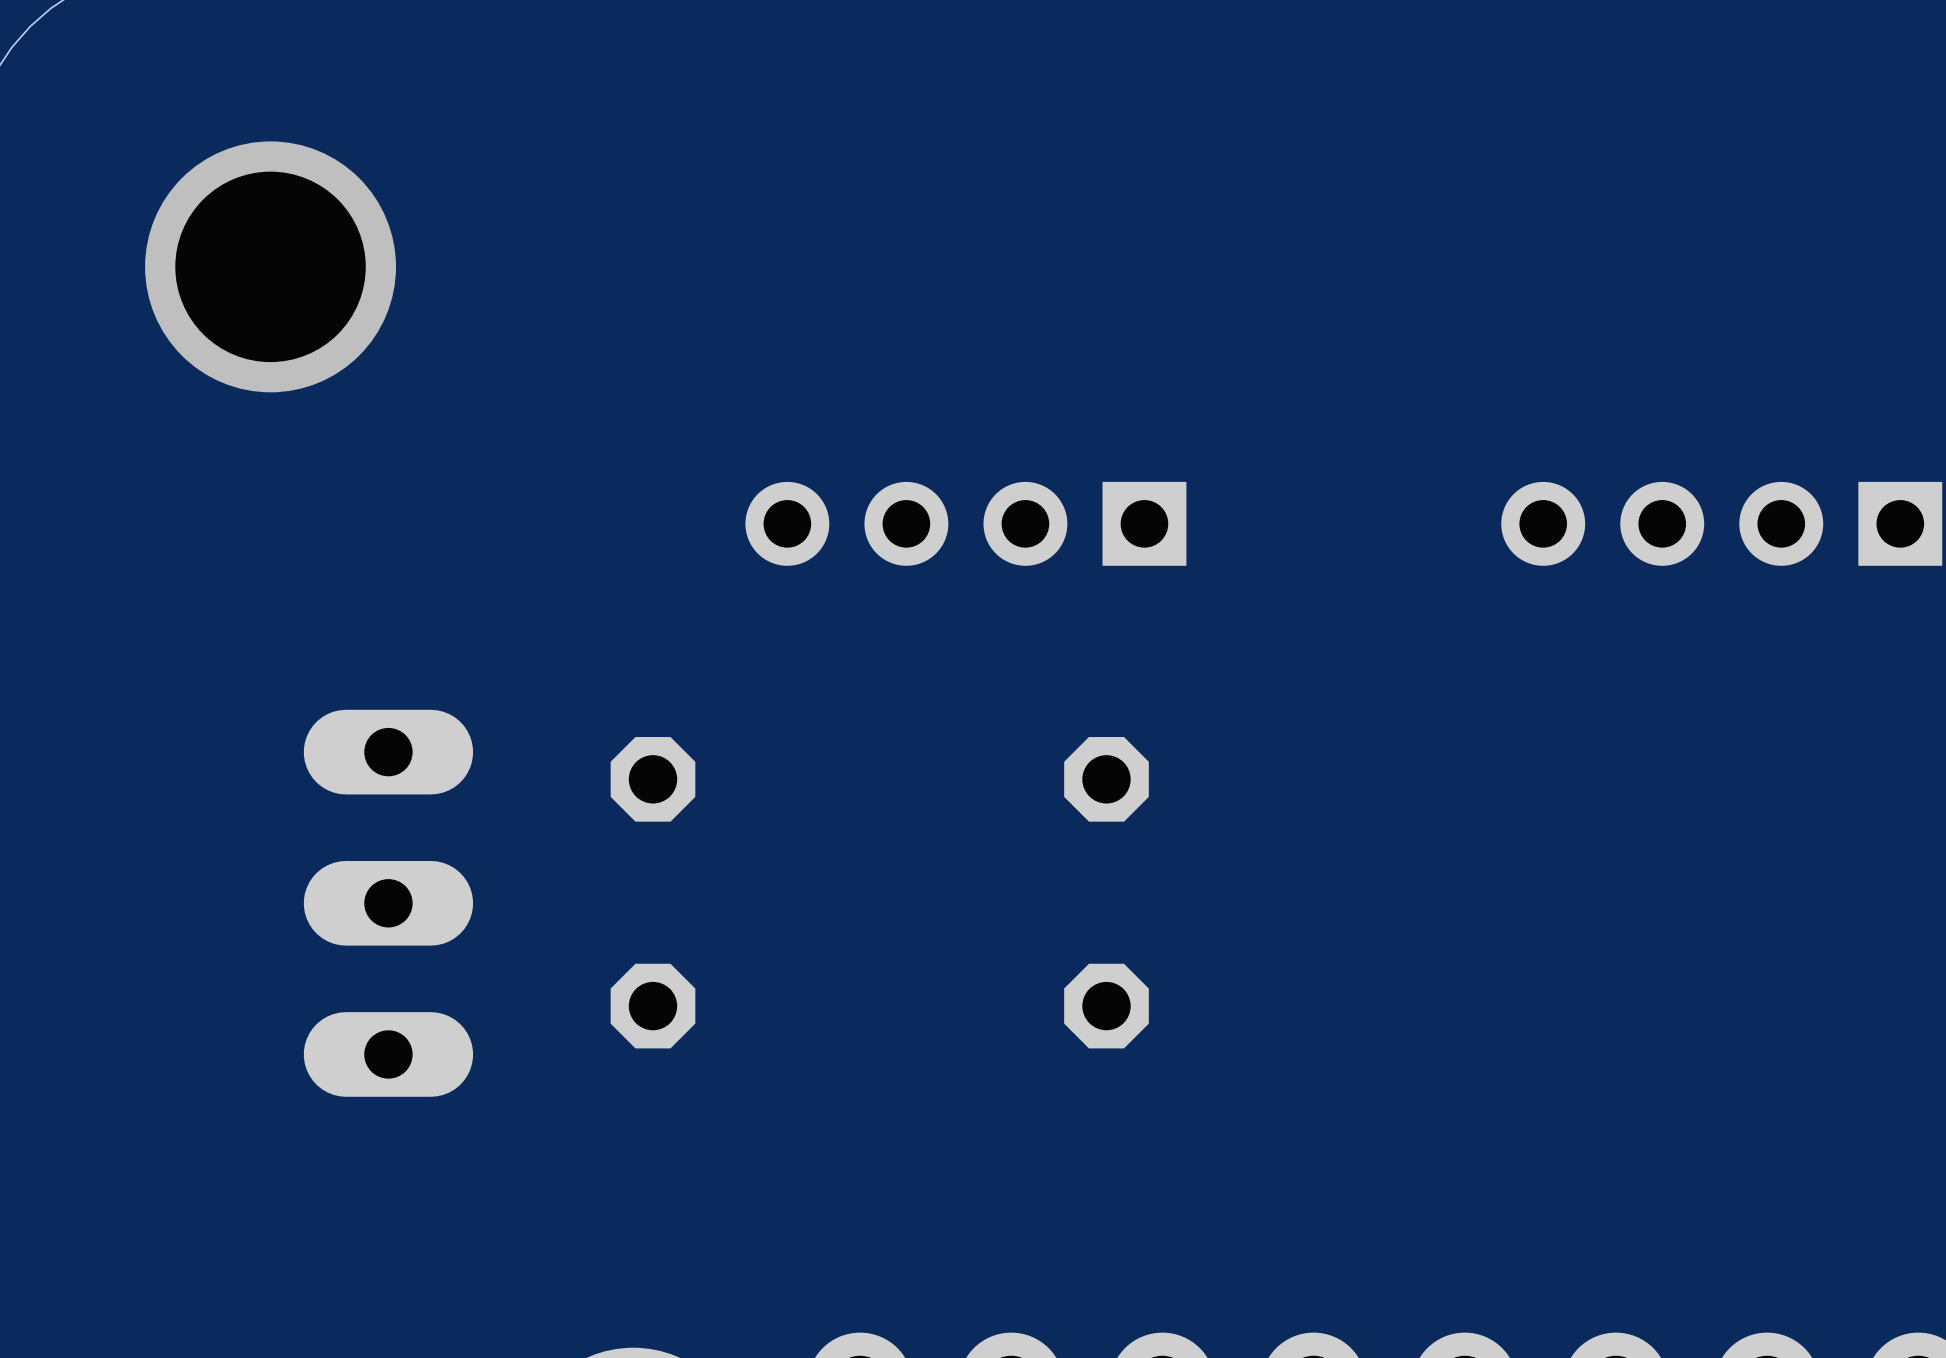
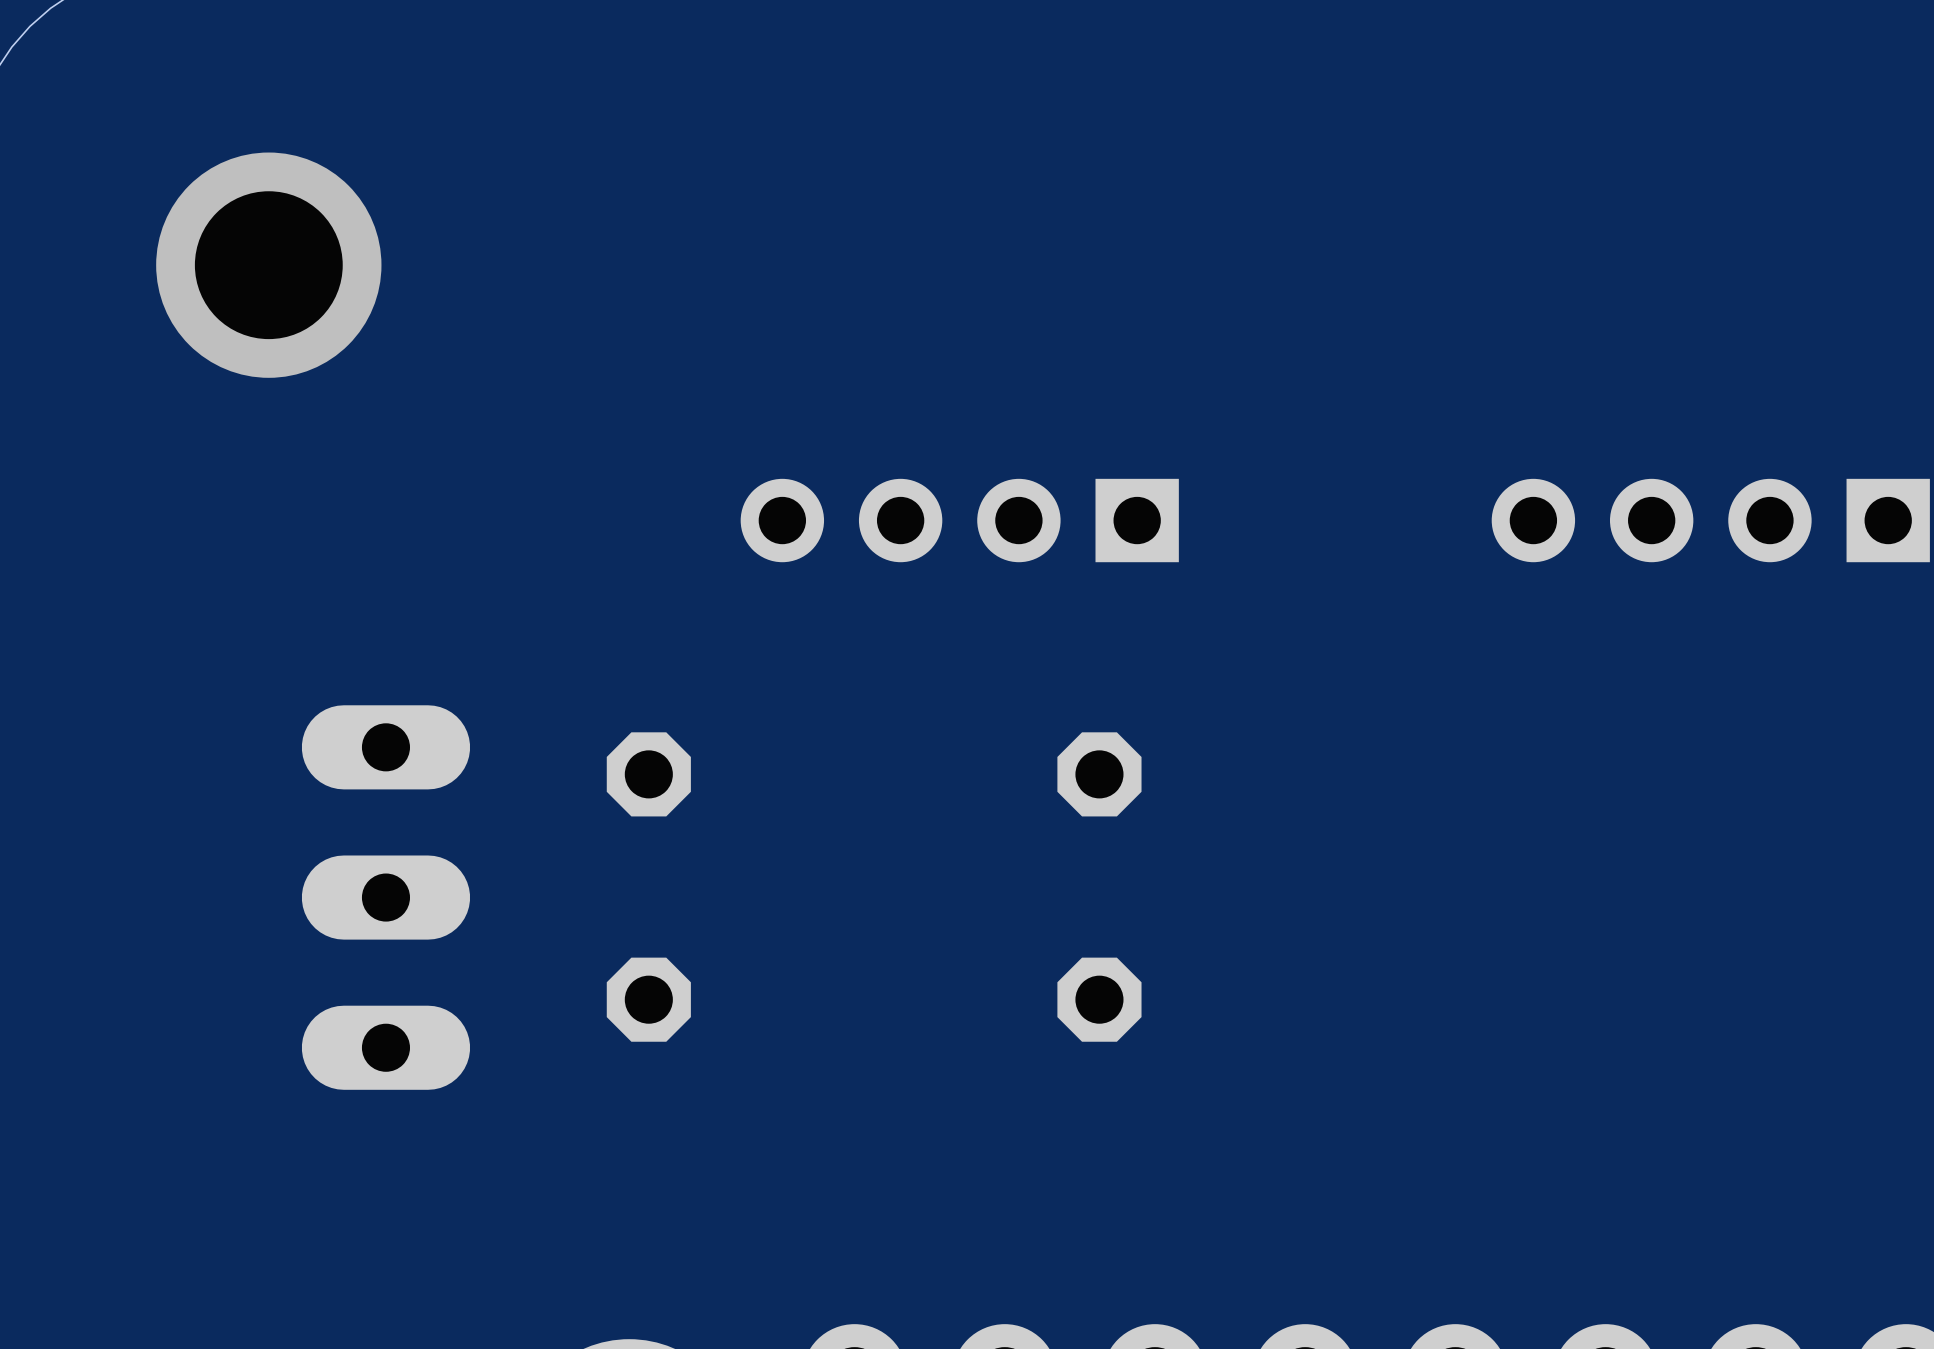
via size: [145, 141, 396, 393] -> [156, 152, 382, 378]

